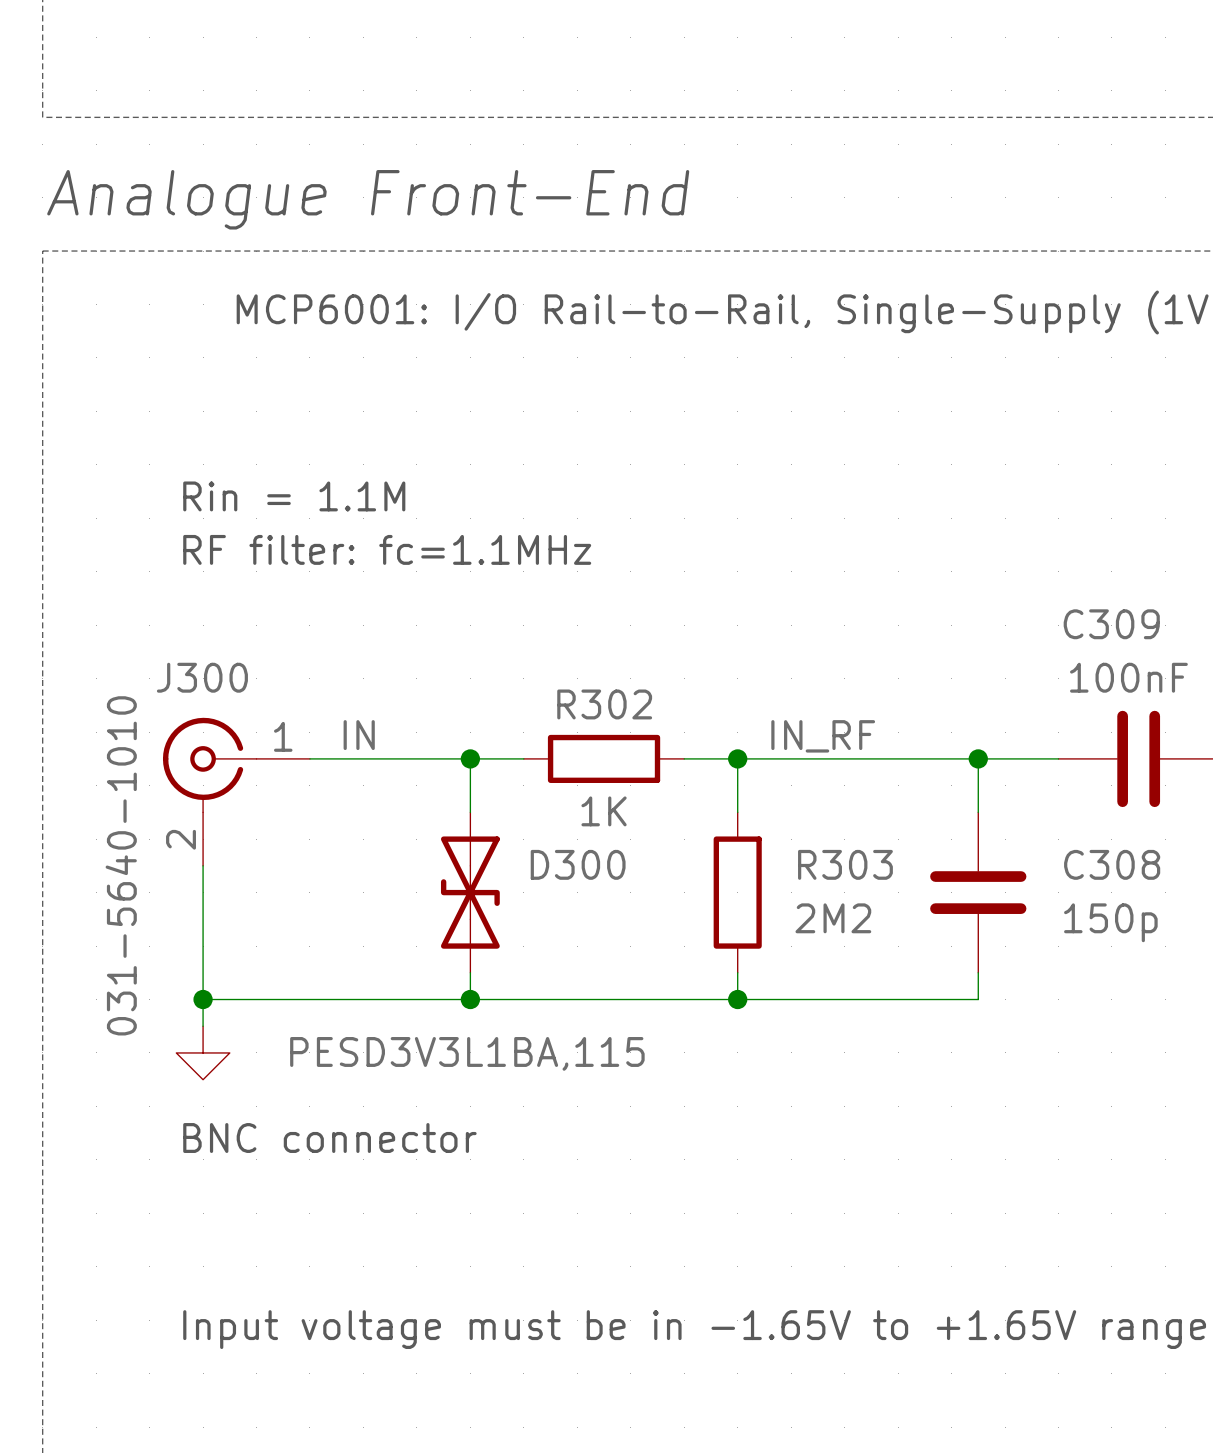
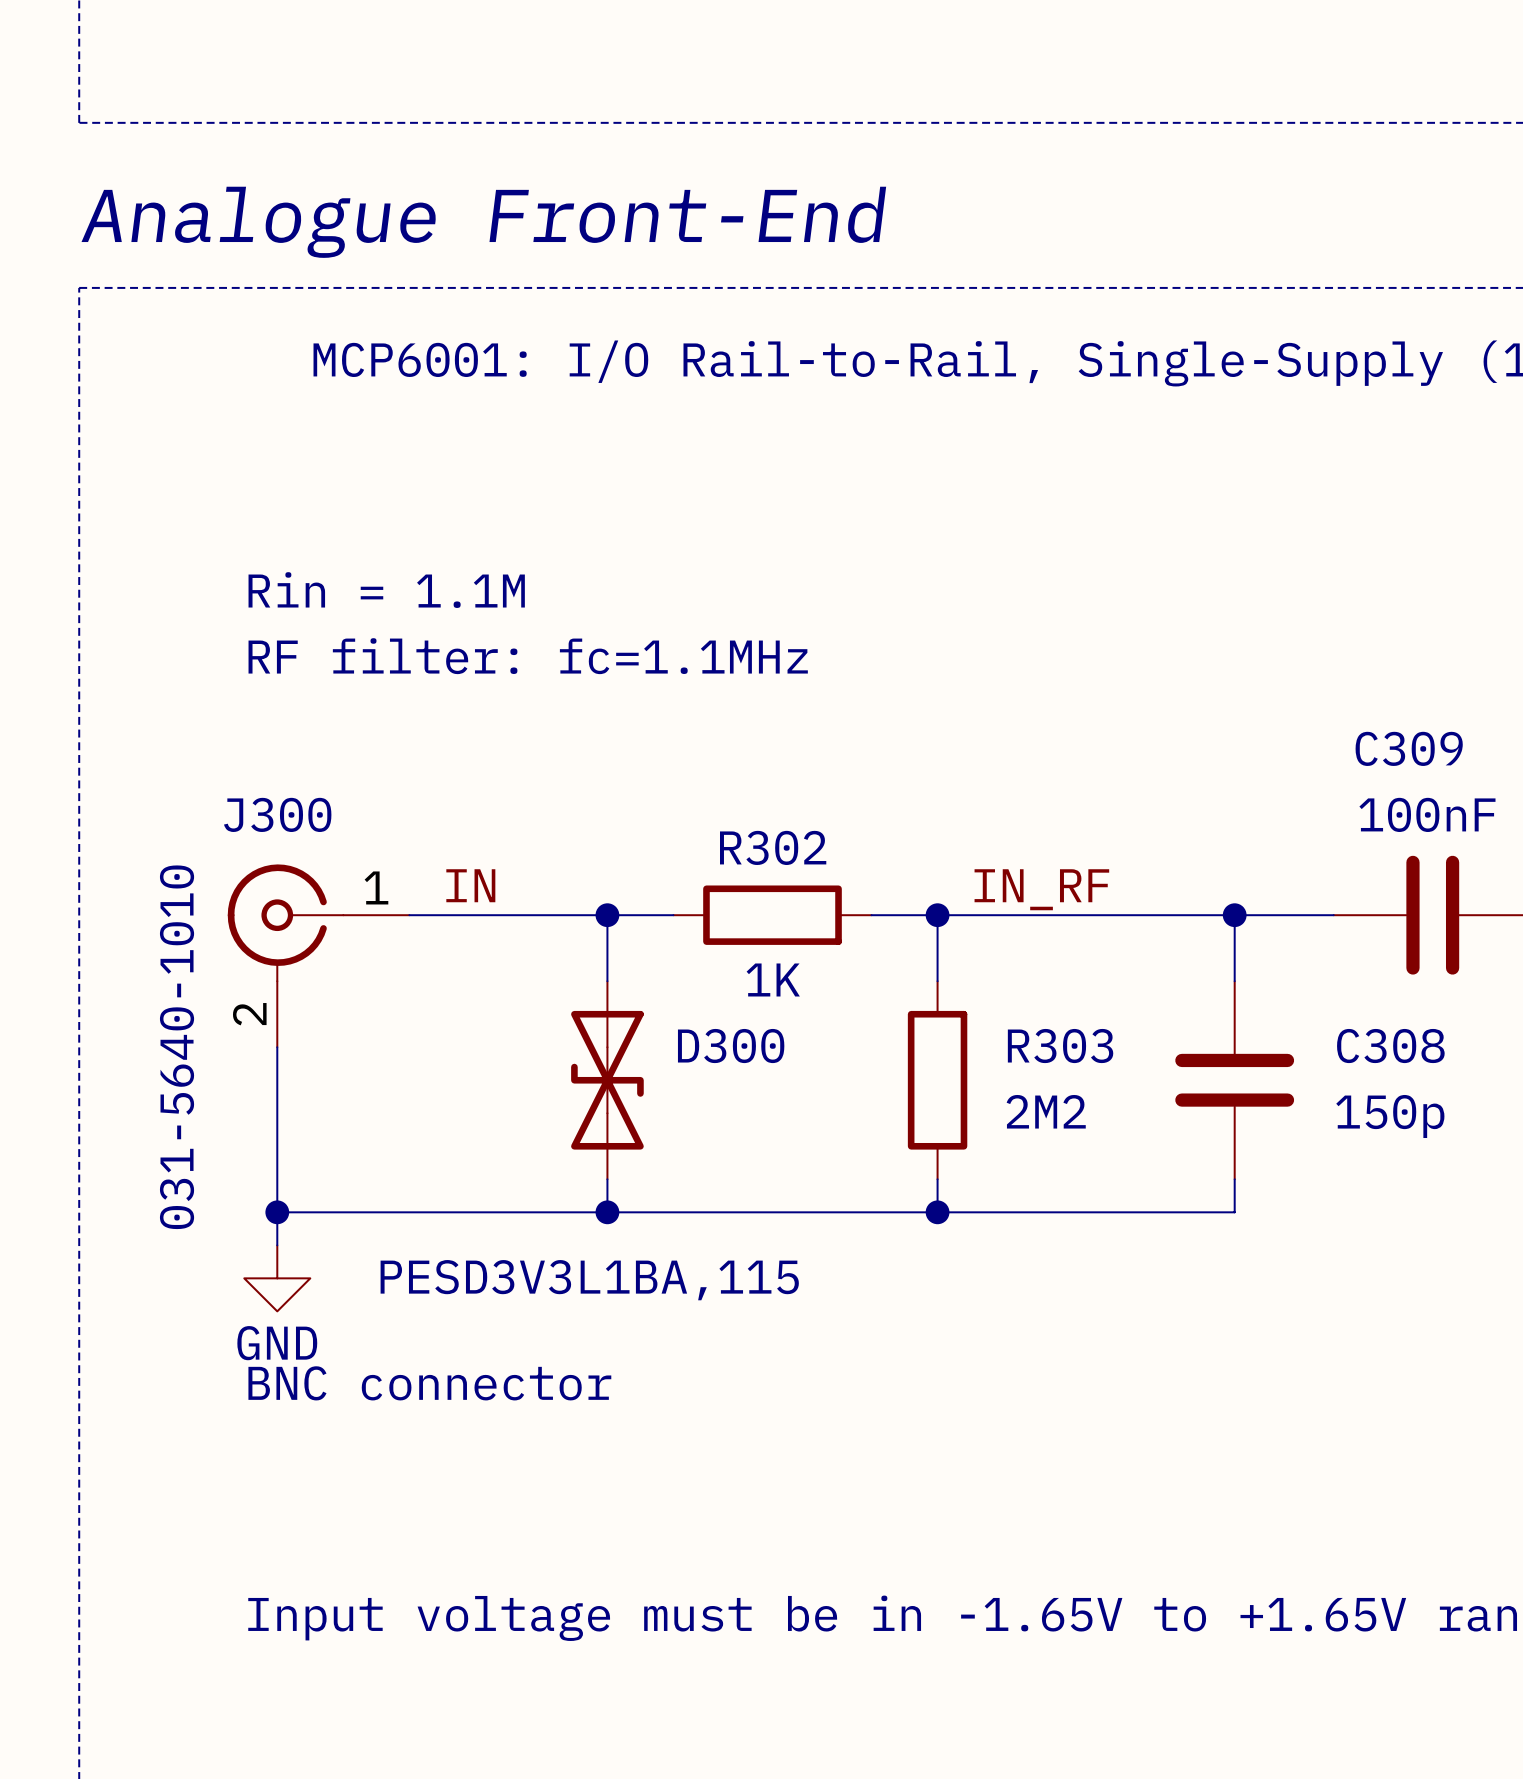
power symbol text: none -> GND (277, 1343)

